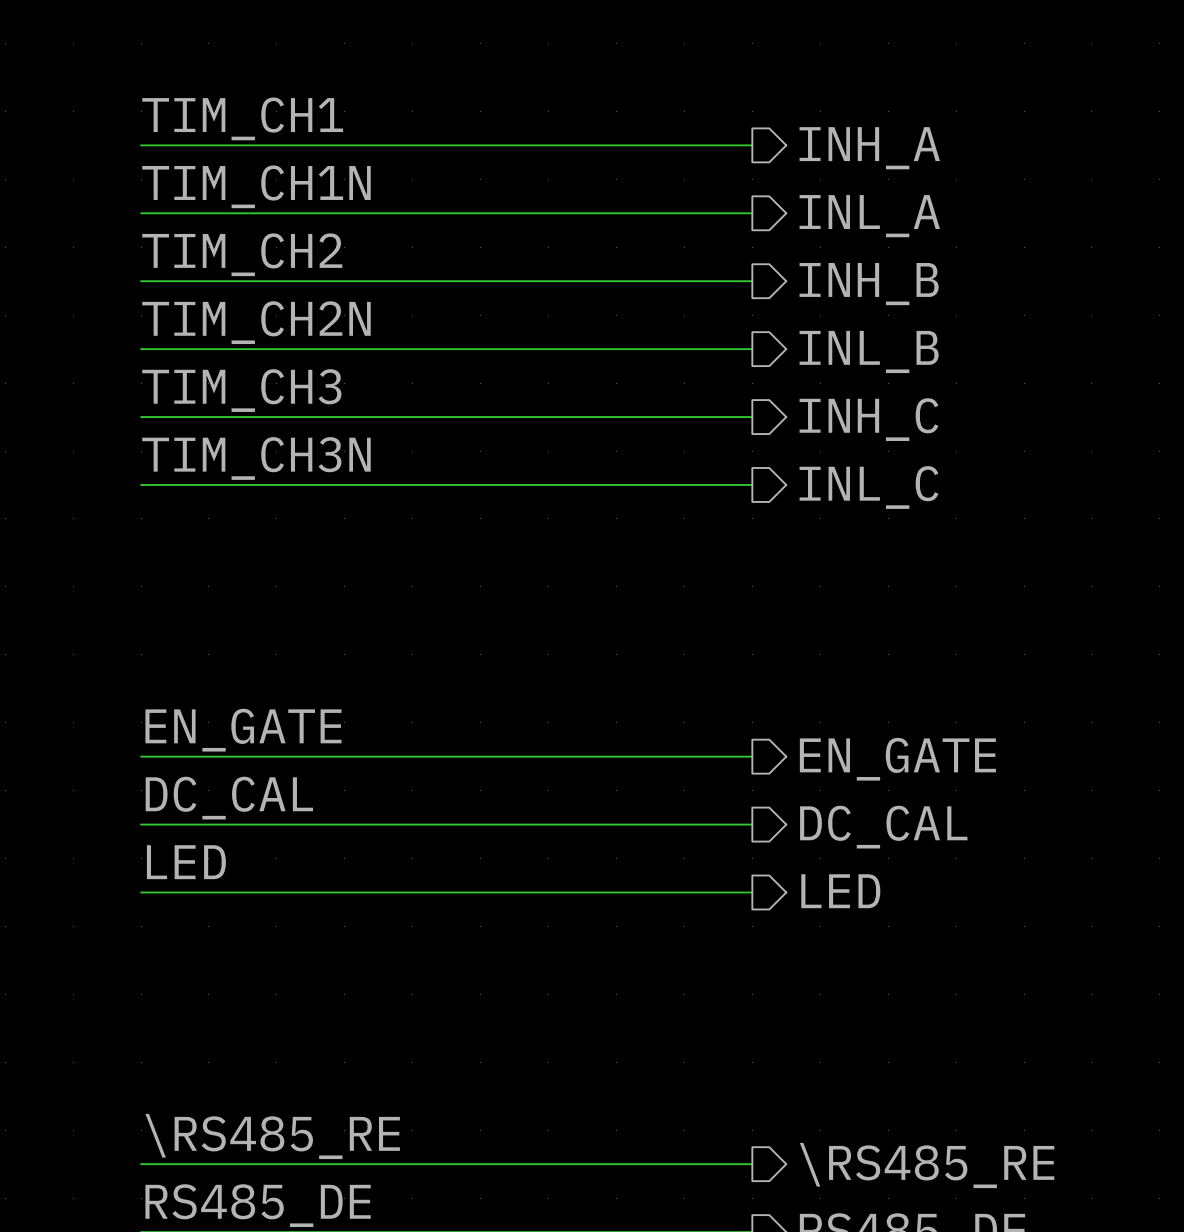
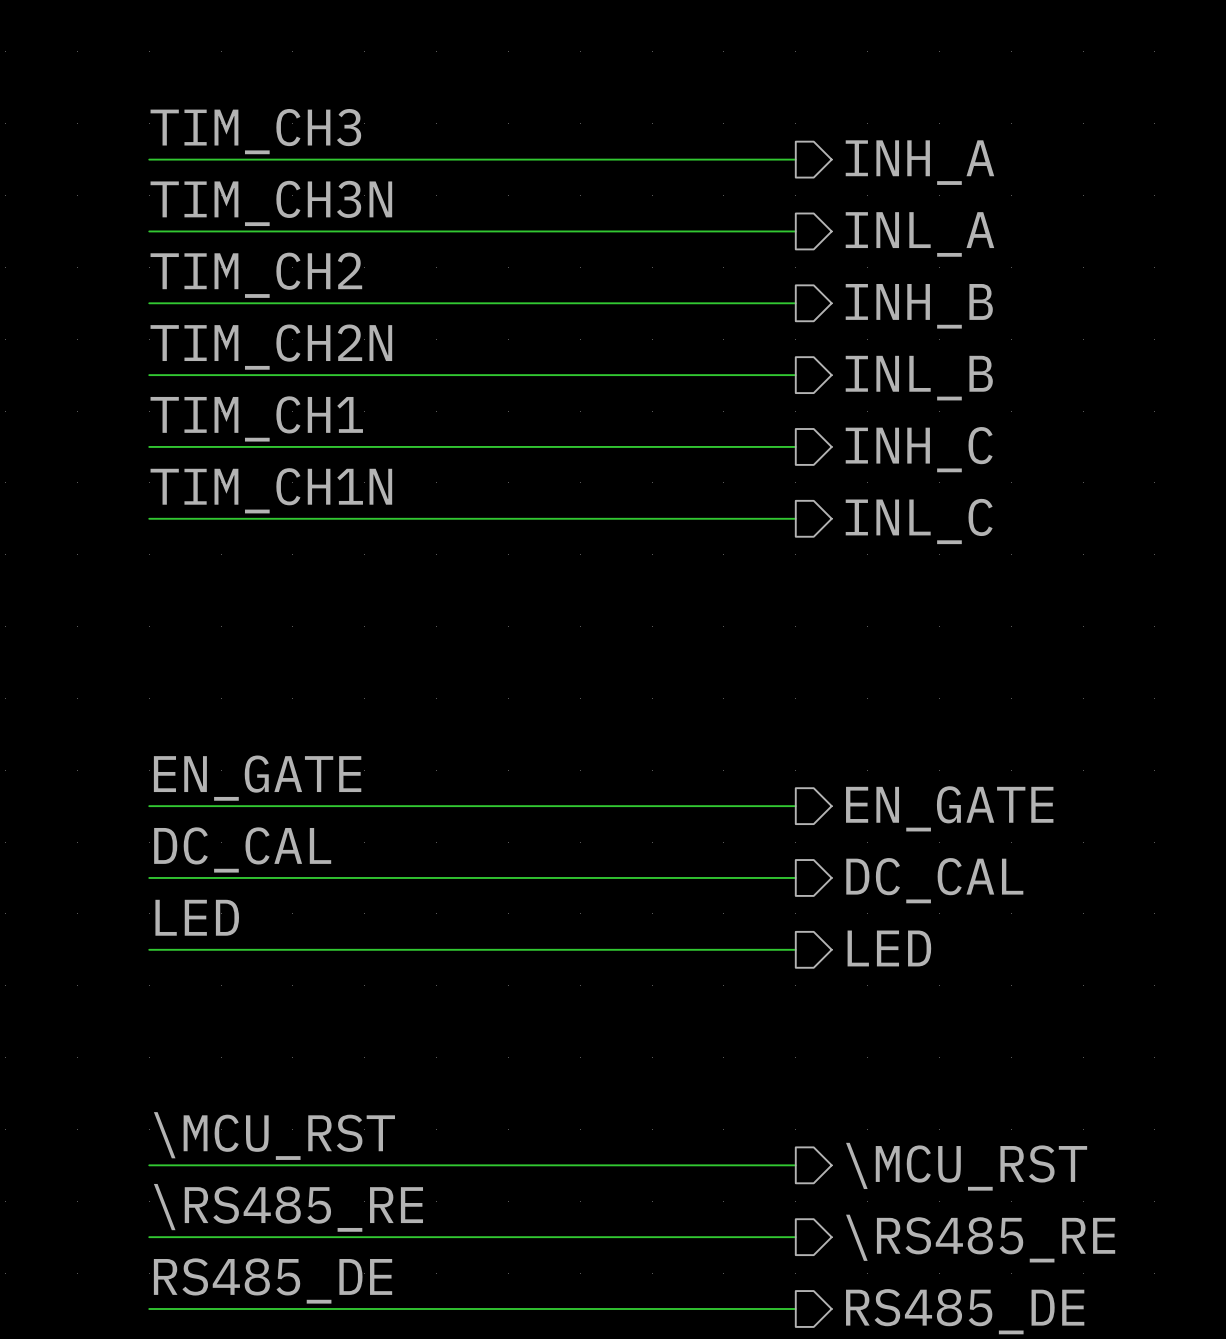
label: TIM_CH1 (242, 118) -> TIM_CH3 (255, 131)
label: TIM_CH1N (256, 186) -> TIM_CH3N (271, 203)
label: TIM_CH3 (241, 390) -> TIM_CH1 (256, 418)
label: TIM_CH3N (256, 458) -> TIM_CH1N (271, 490)
label: none -> \MCU_RST (274, 1136)
wire: none -> (149, 1165) (795, 1165)
hierarchical label: none -> \MCU_RST (966, 1166)

